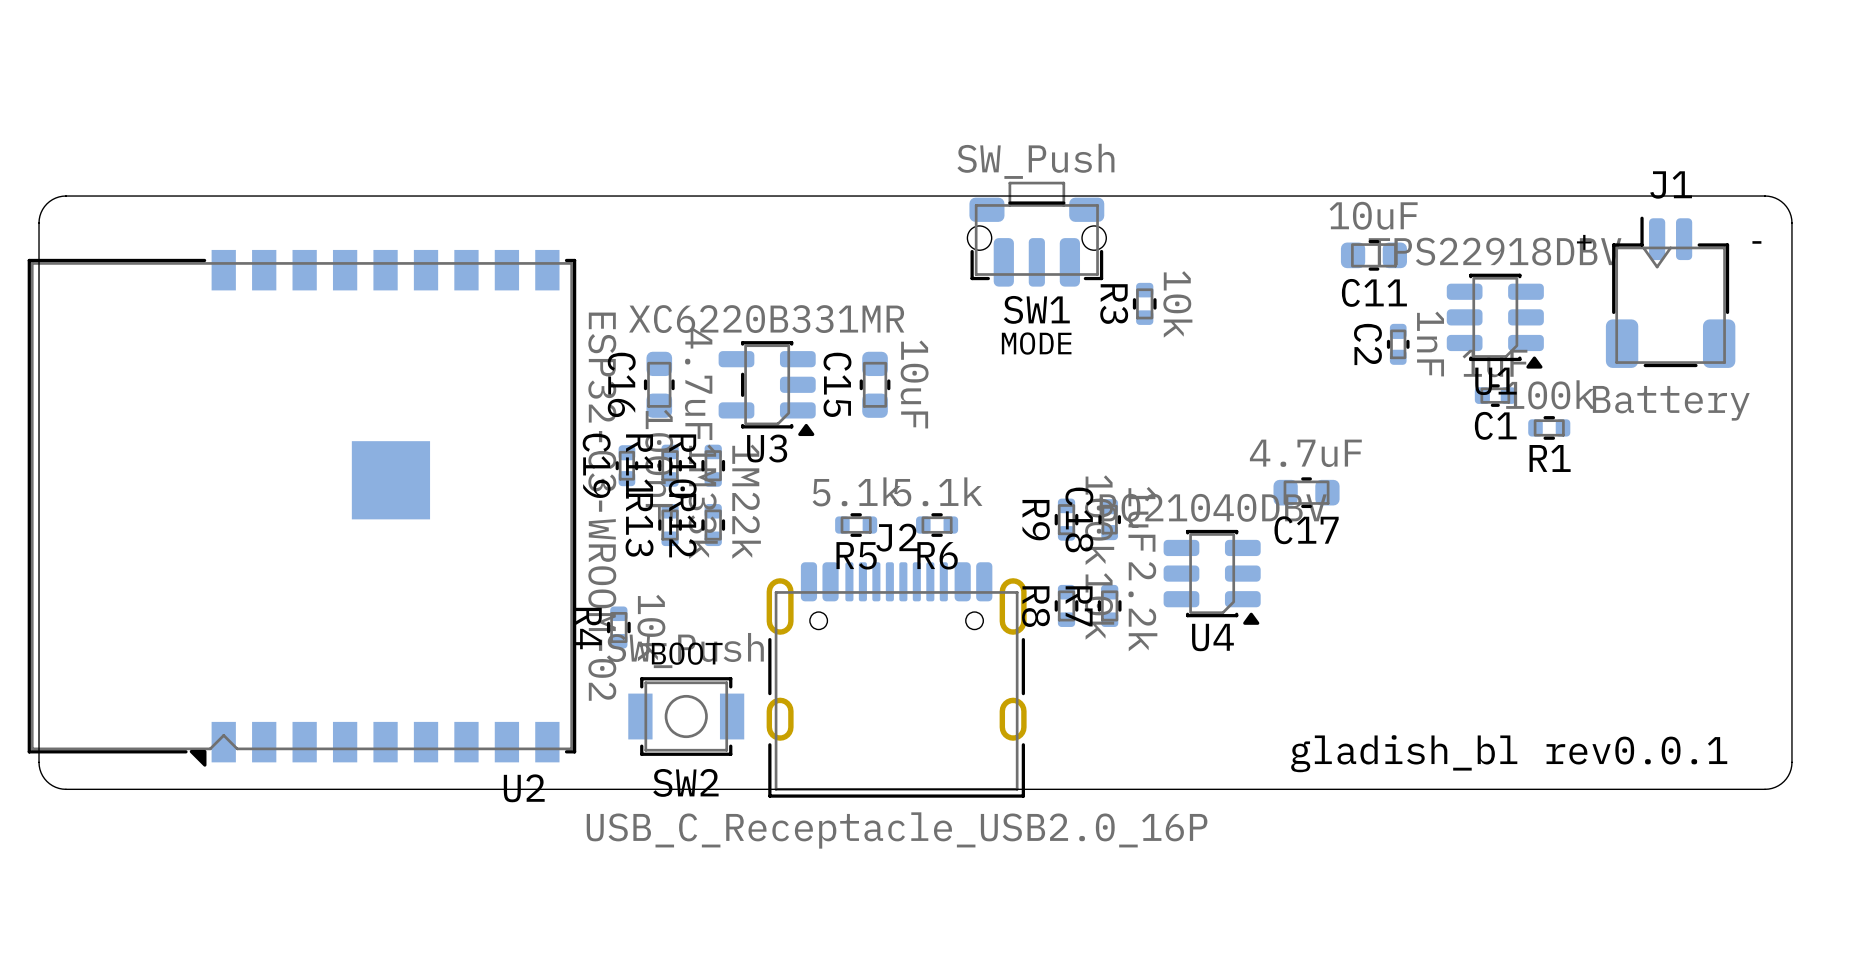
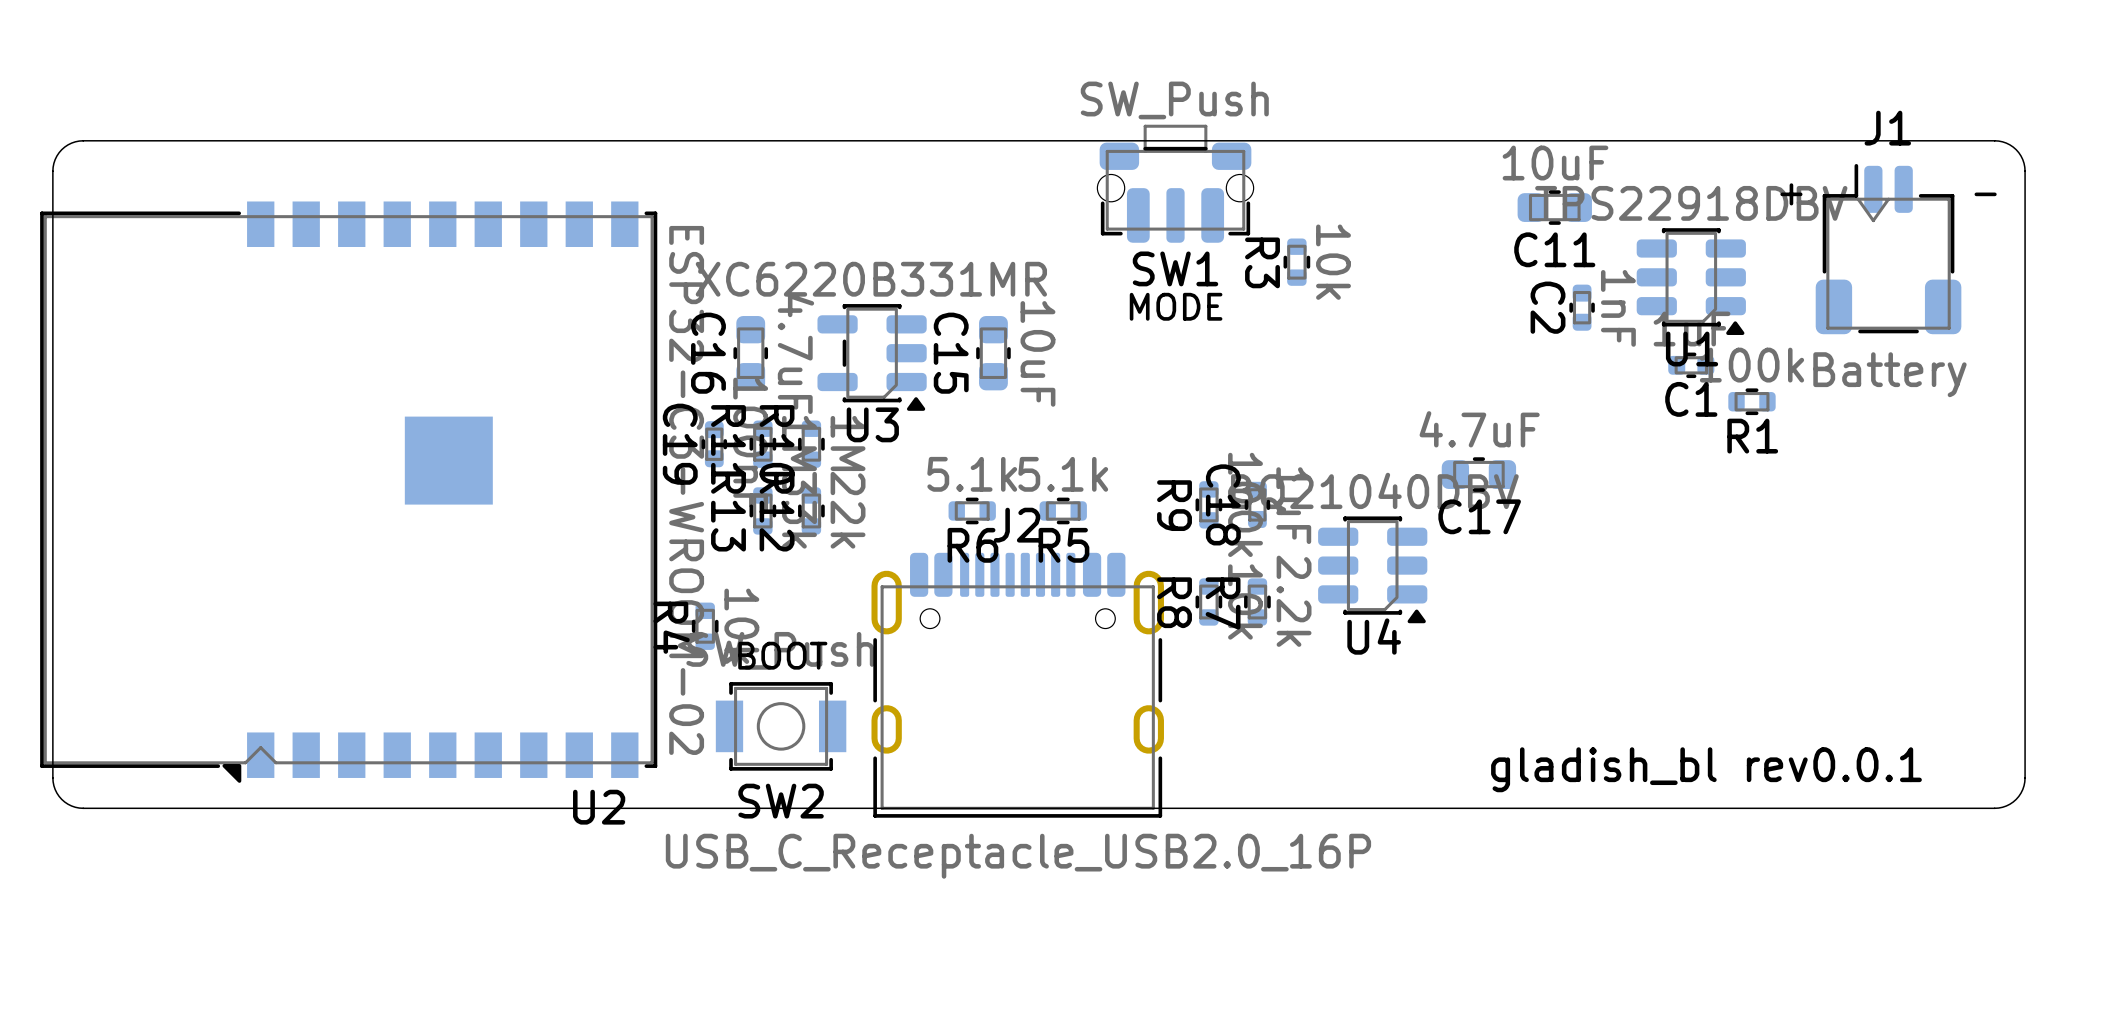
R5 name: R5 (856, 555) -> R6 (972, 545)
R6 name: R6 (937, 555) -> R5 (1063, 545)

